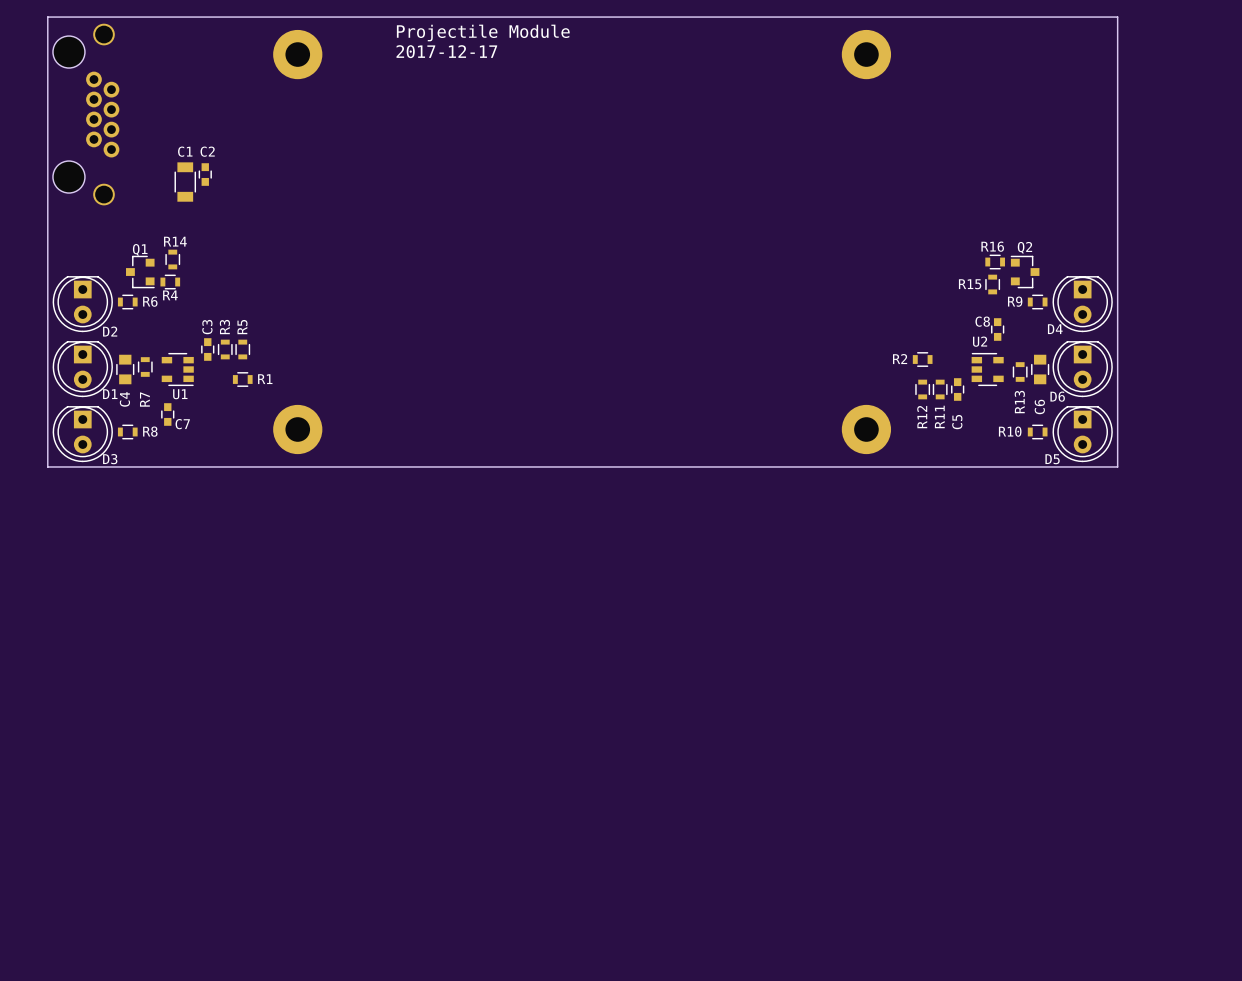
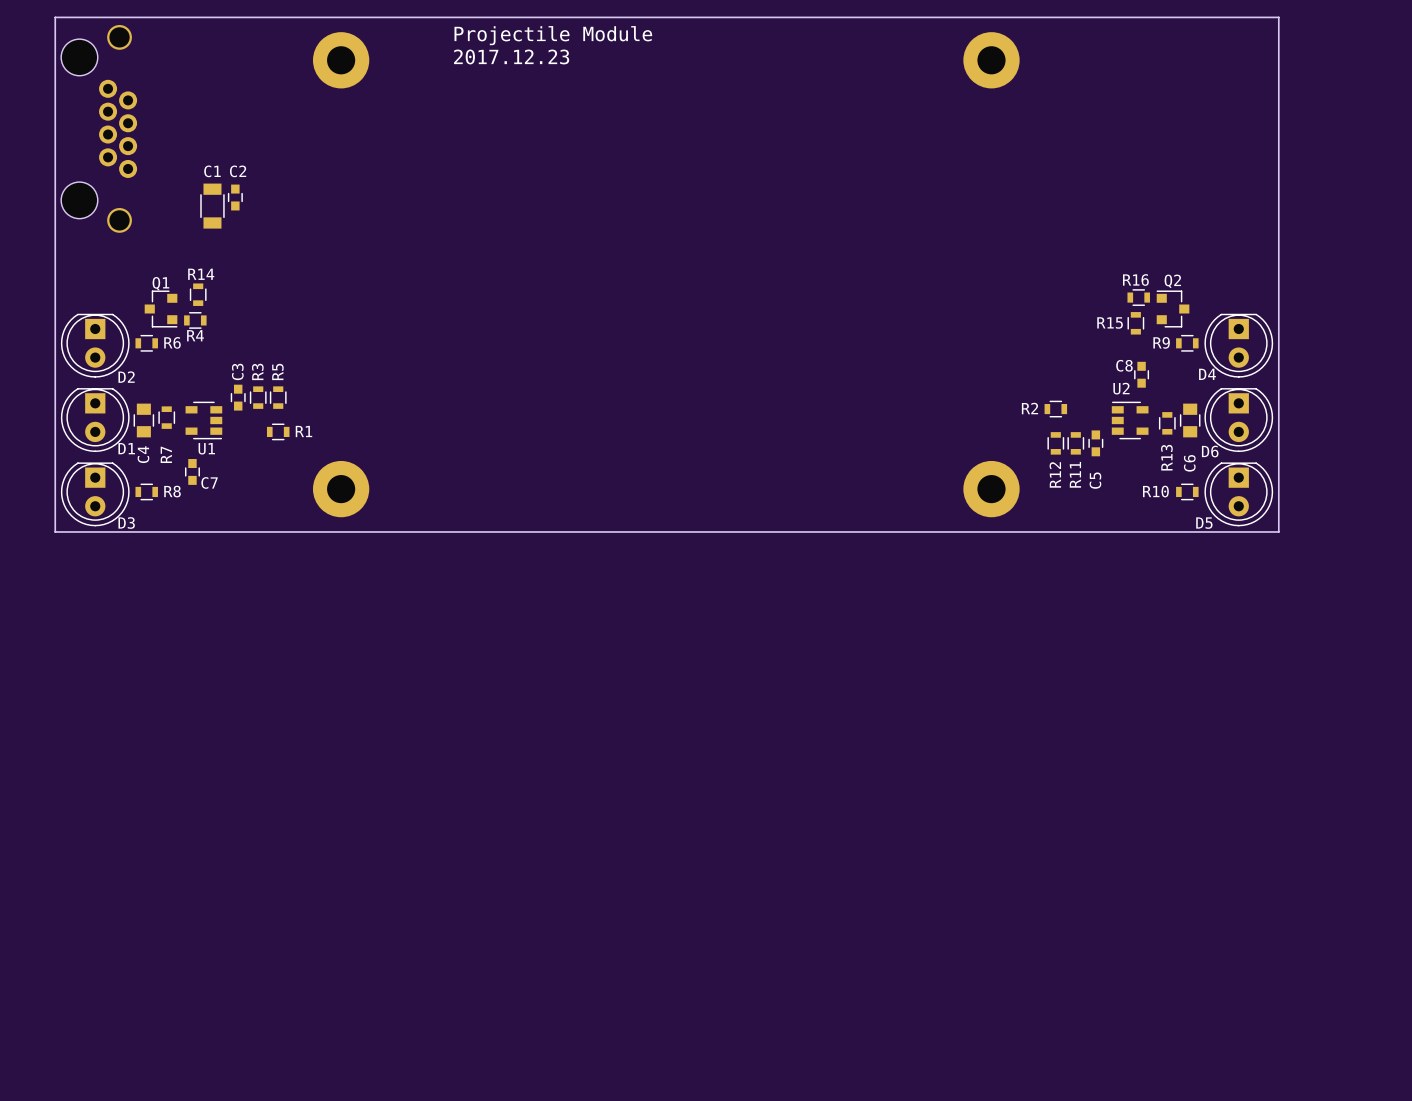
text: 2017-12-17 (446, 51) -> 2017.12.23 (511, 56)

